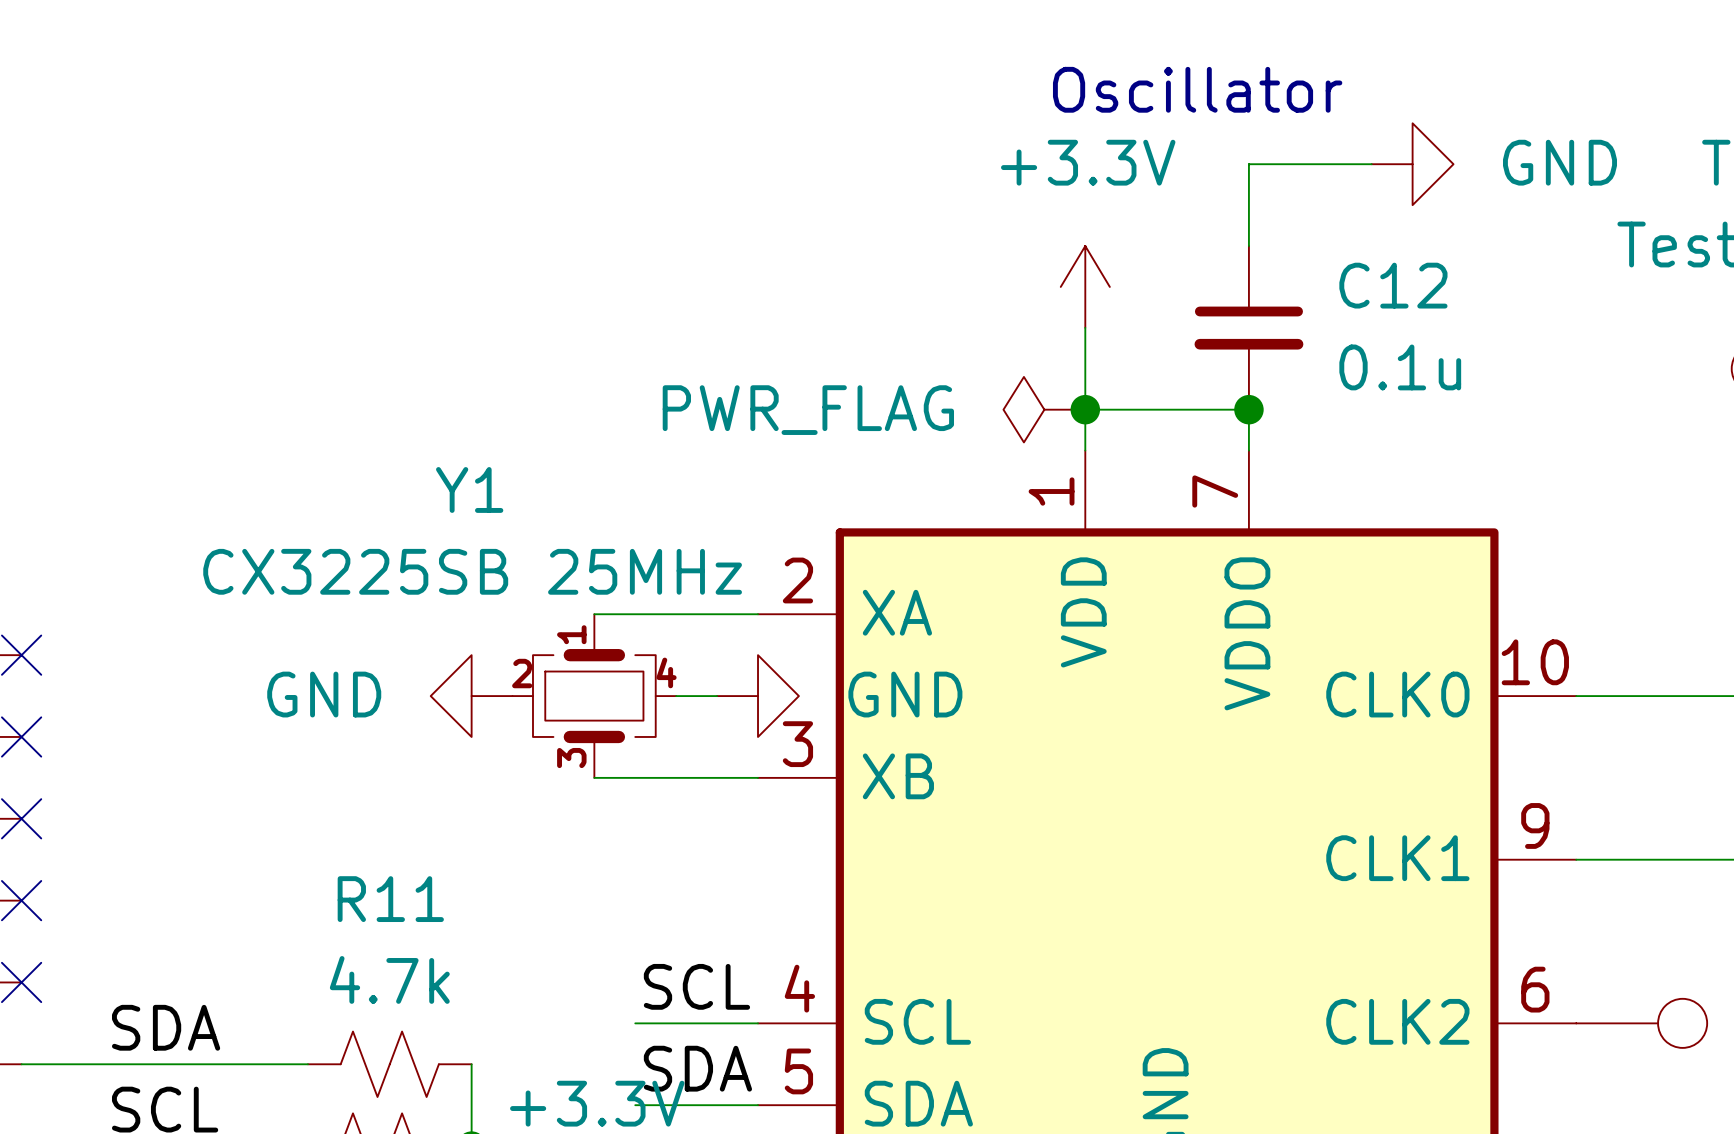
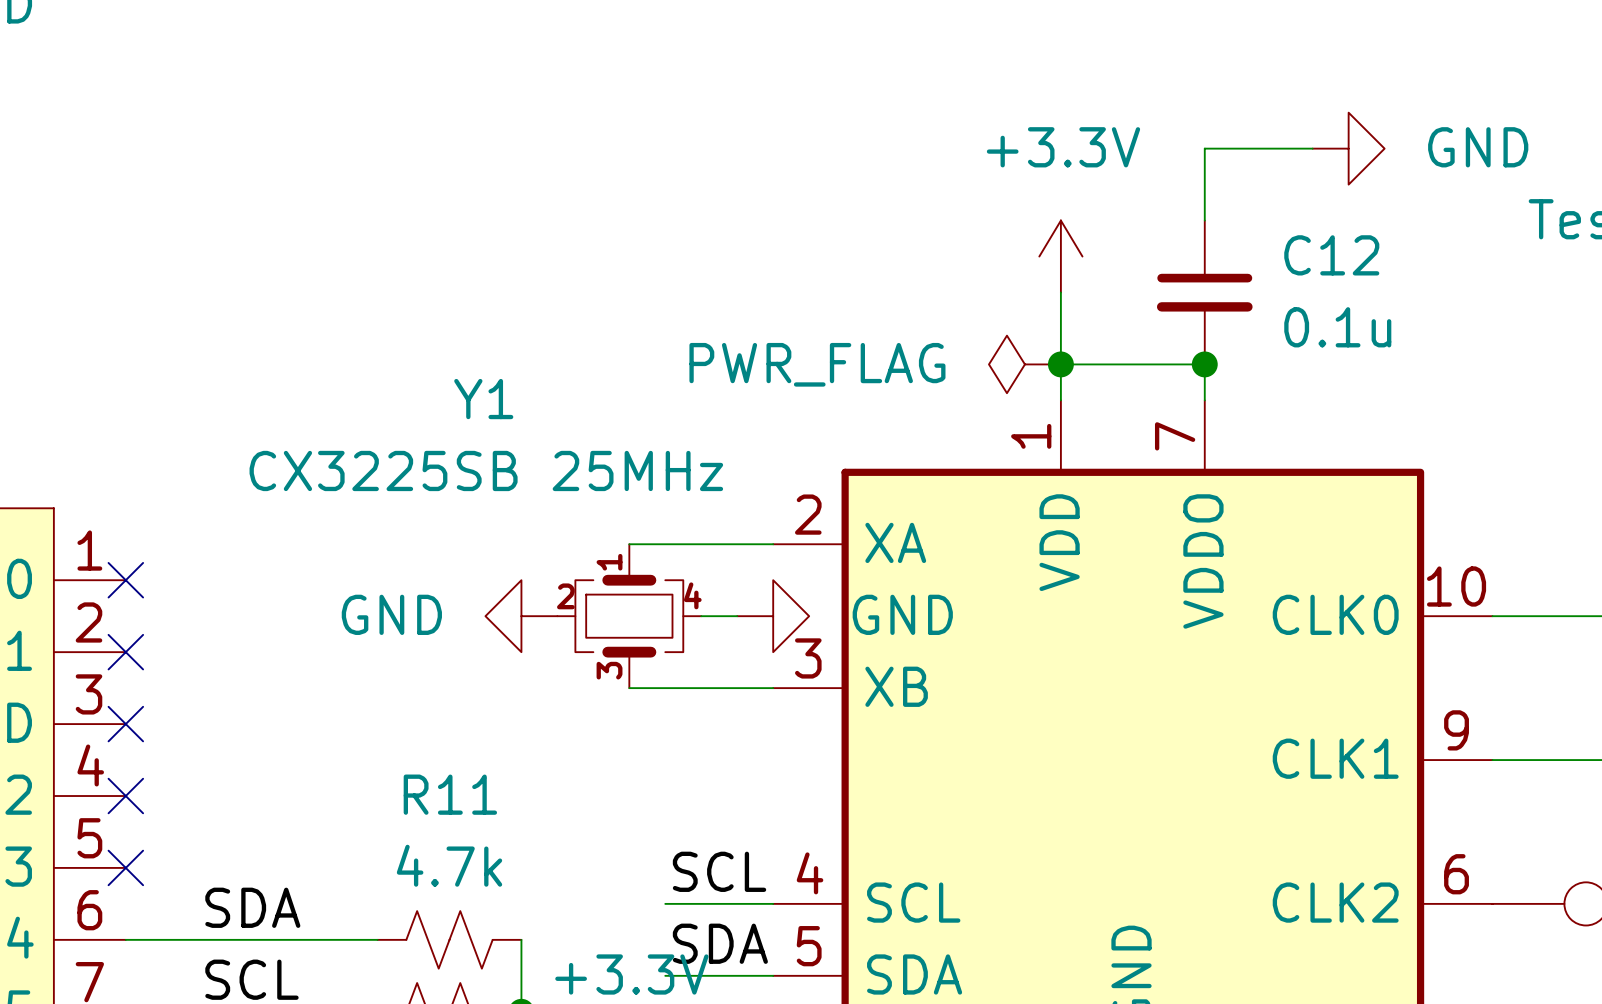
text: Oscillator (1197, 89) -> none
Y1 name position: Y1 (469, 489) -> Y1 (483, 399)
Y1 value position: CX3225SB 25MHz (472, 571) -> CX3225SB 25MHz (486, 470)

